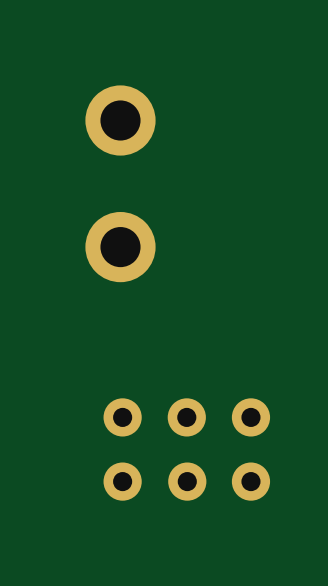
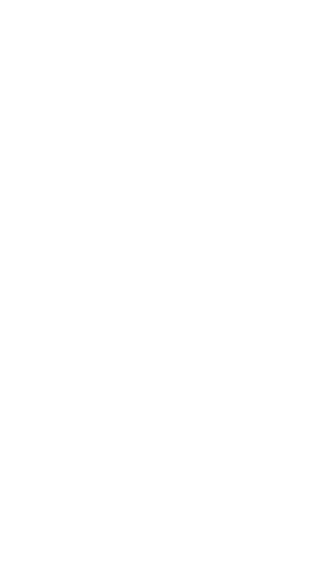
part: (120, 120) -> none
part: (120, 247) -> none
part: (186, 449) -> none

